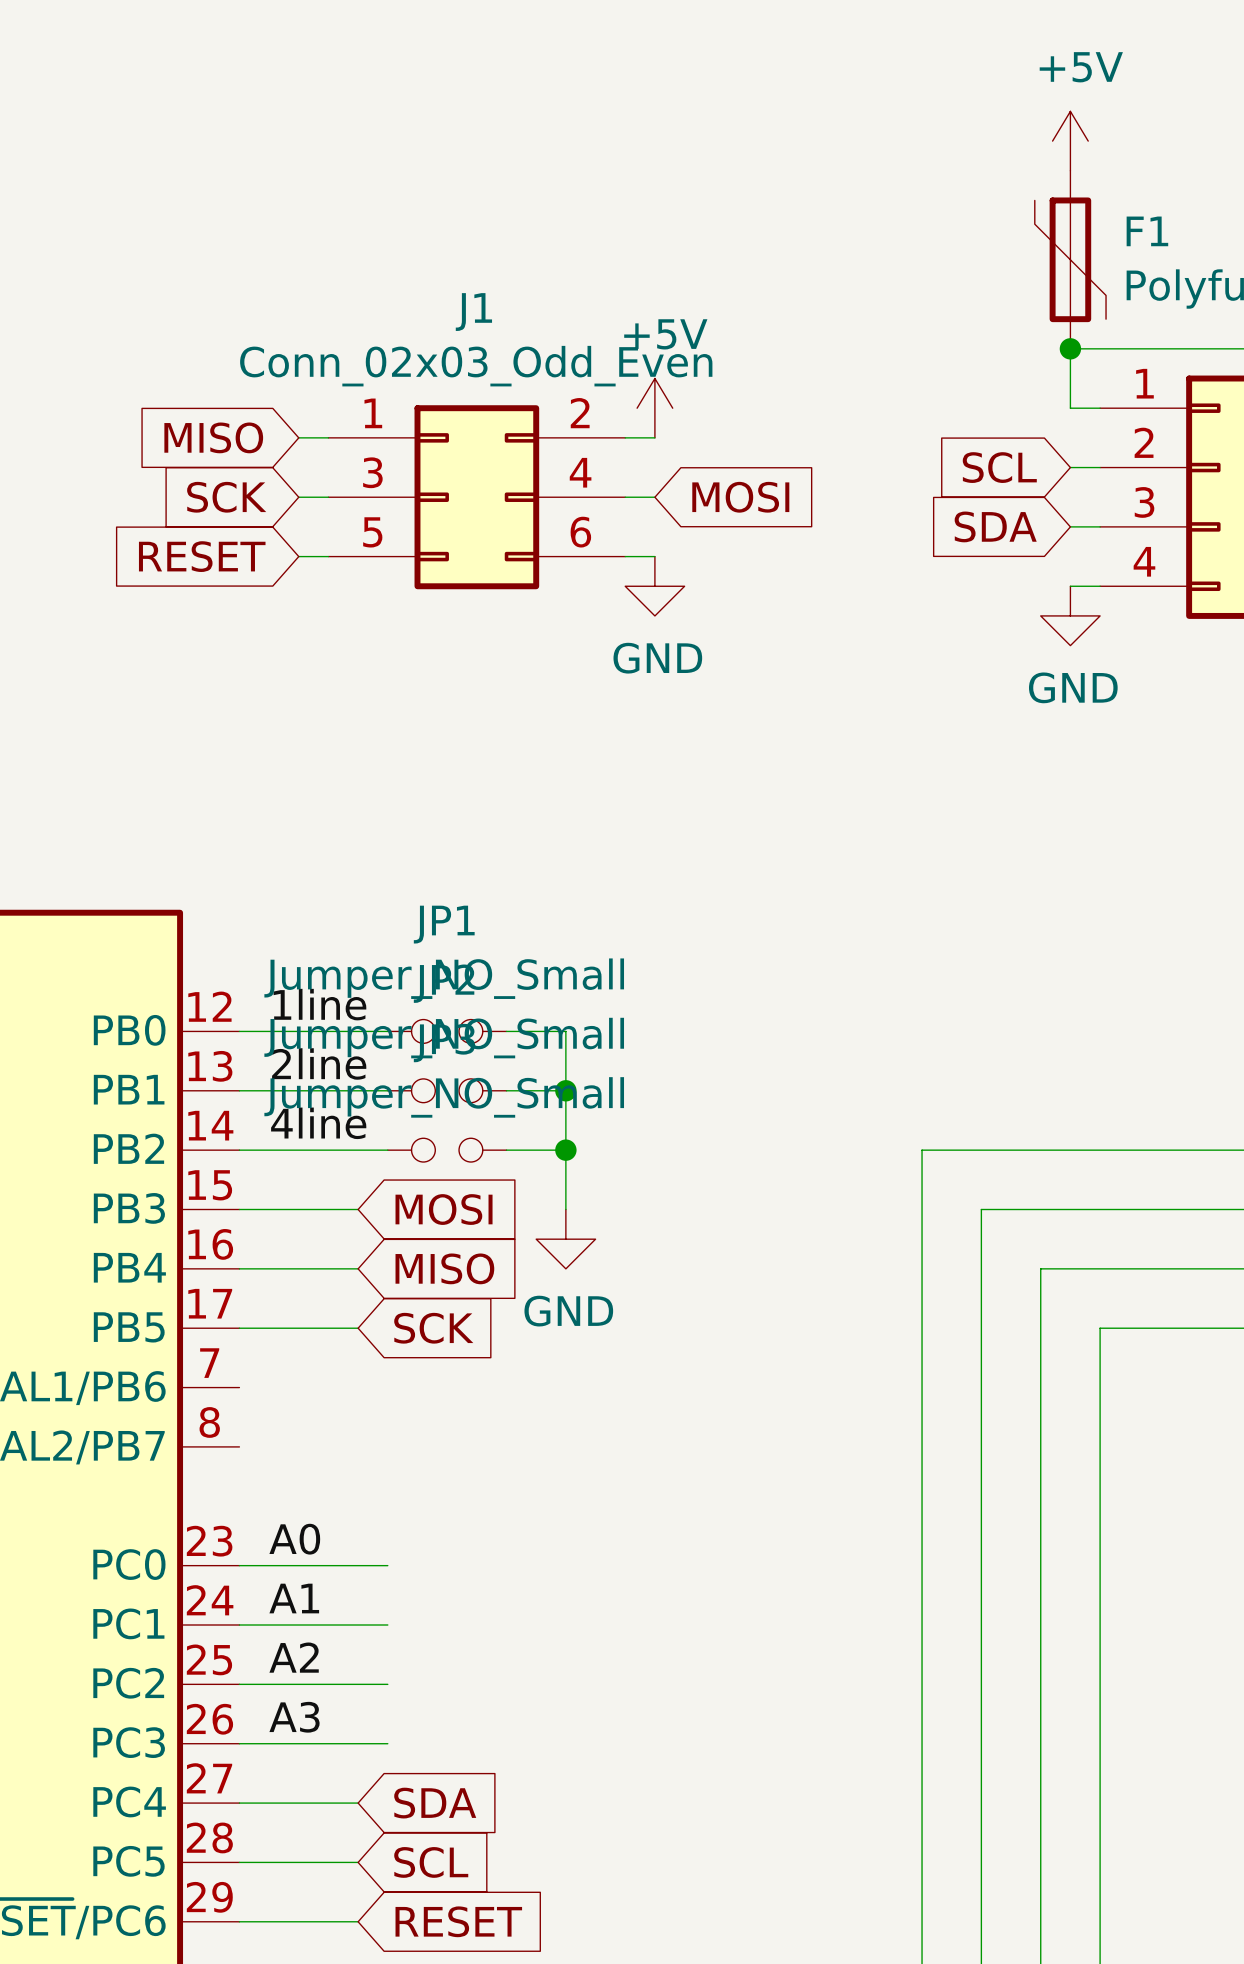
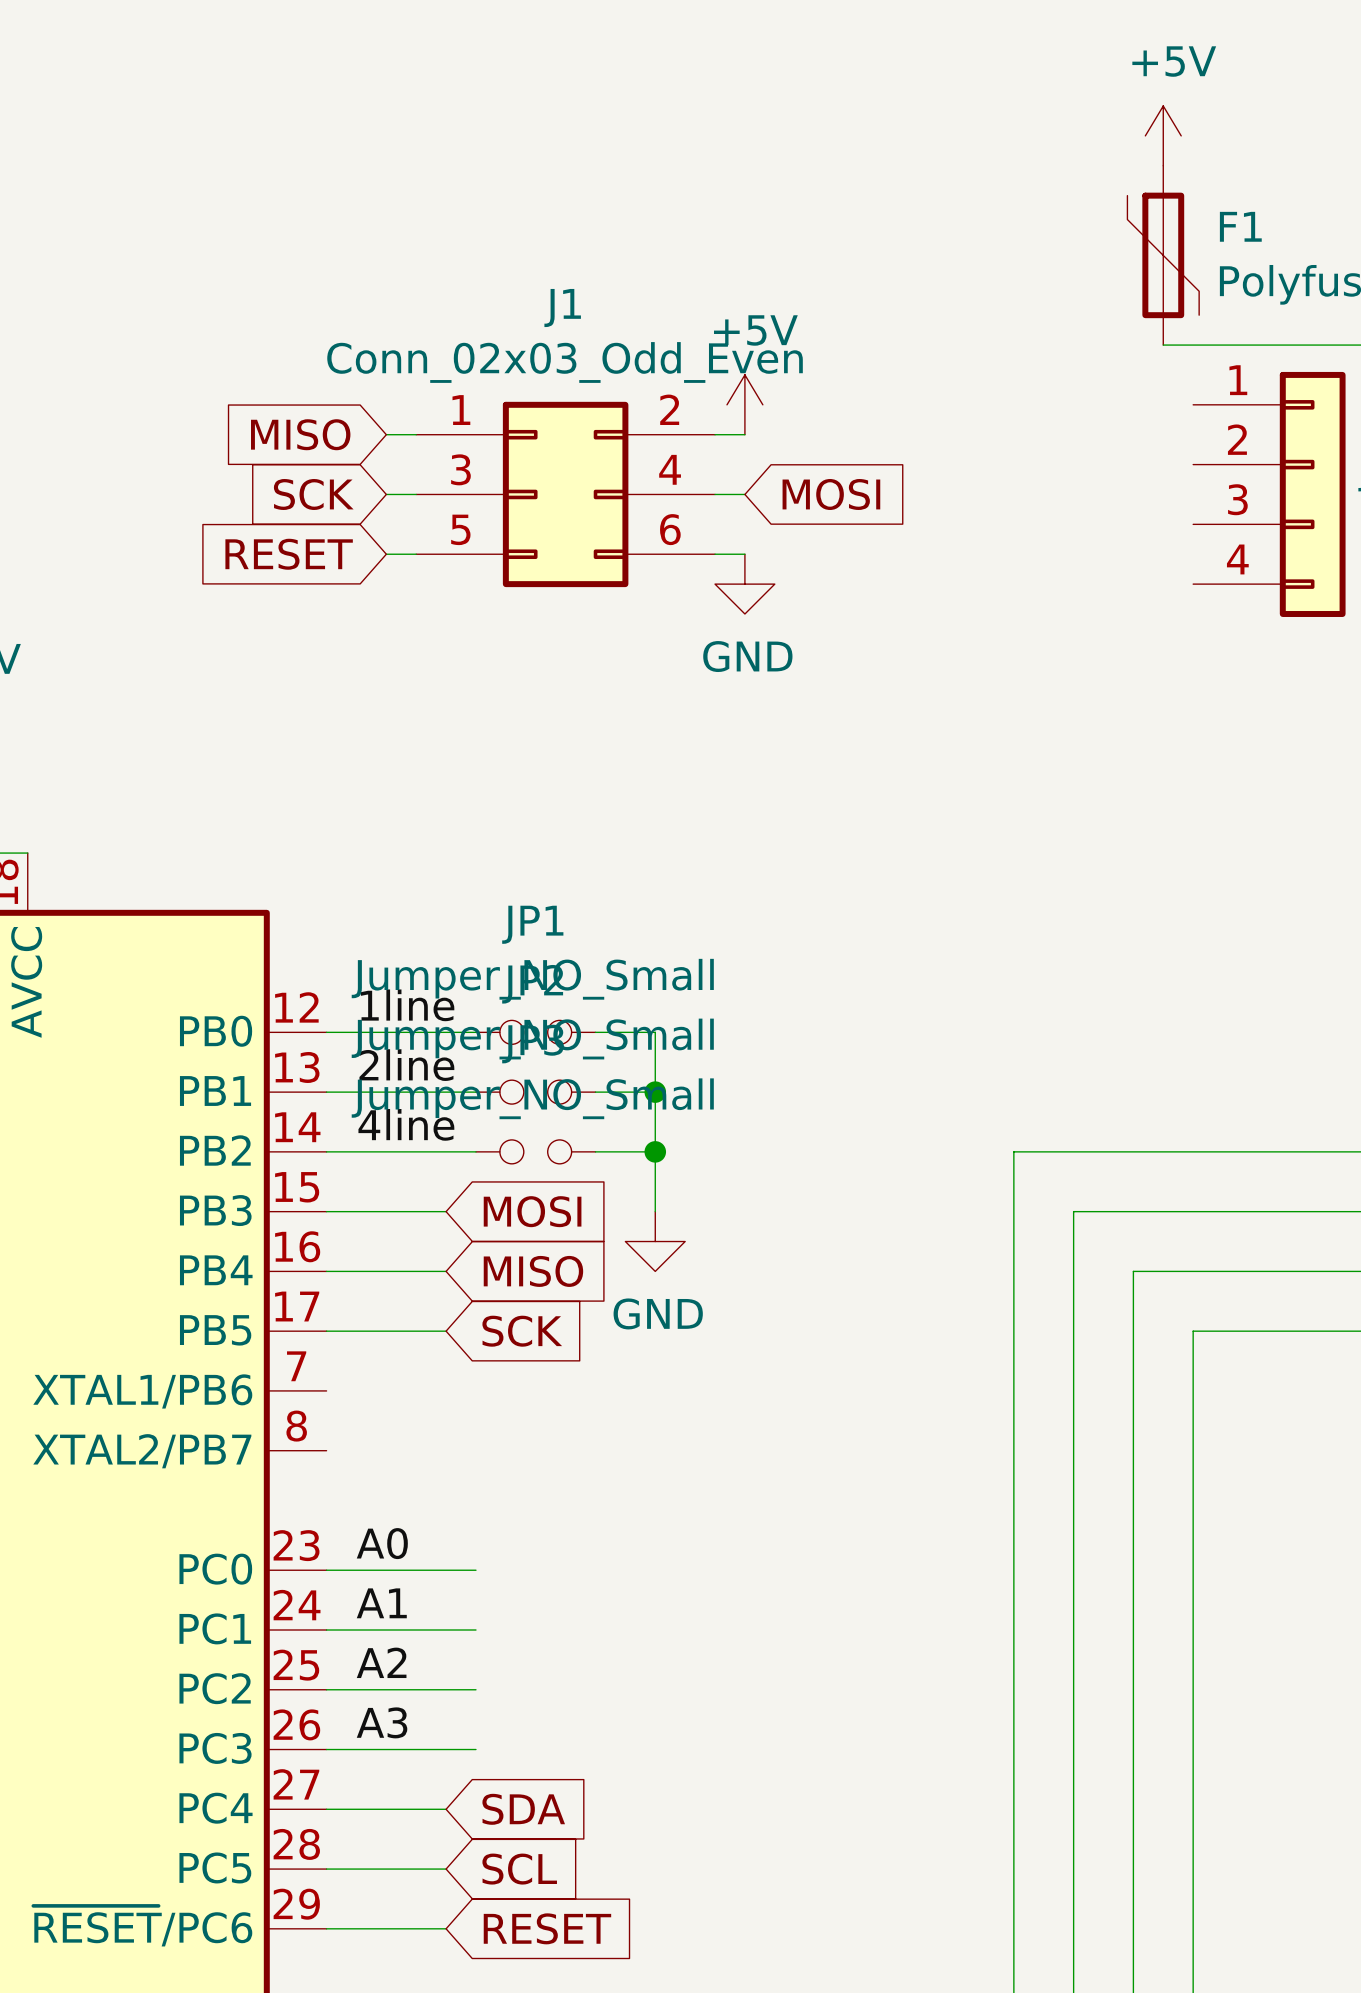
wire: (1070, 348) (1070, 408) (1100, 408) -> none
junction: (1070, 348) -> none
global label: SCL (999, 467) -> none
wire: (1070, 467) (1100, 467) -> none
global label: SDA (995, 526) -> none
wire: (1070, 526) (1100, 526) -> none
wire: (1070, 586) (1100, 586) -> none
power symbol: GND (1070, 615) -> none

